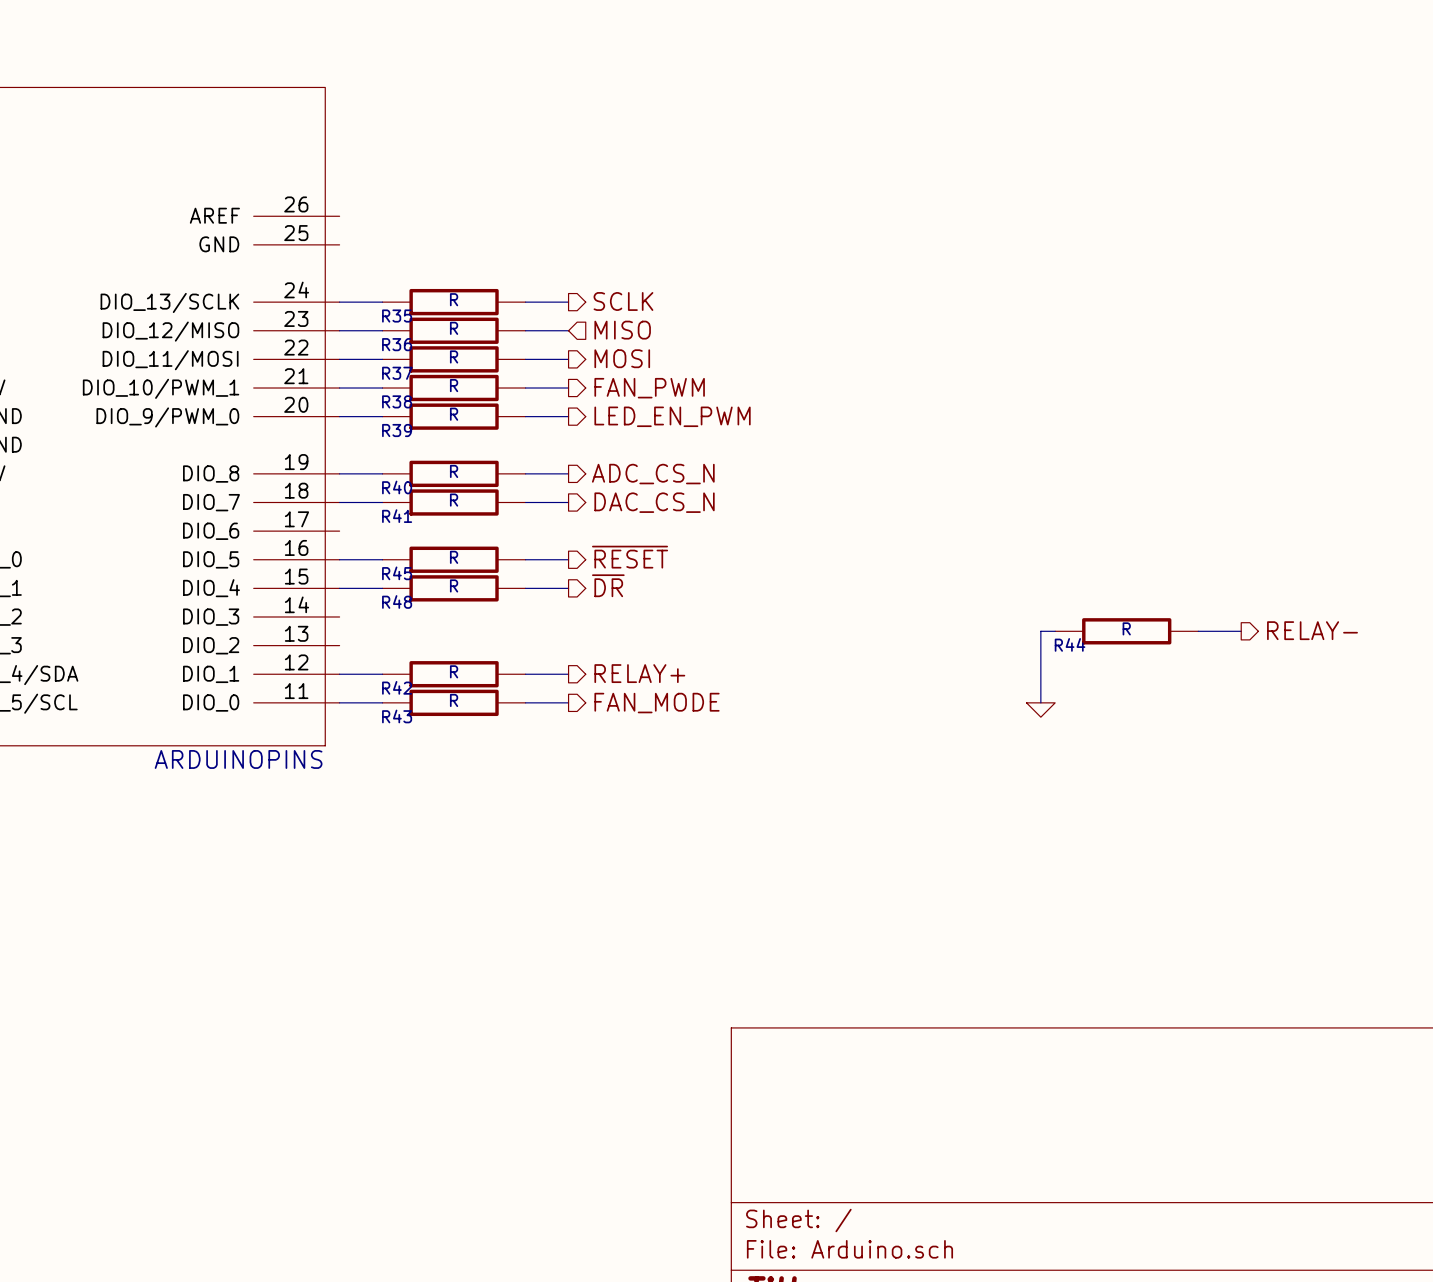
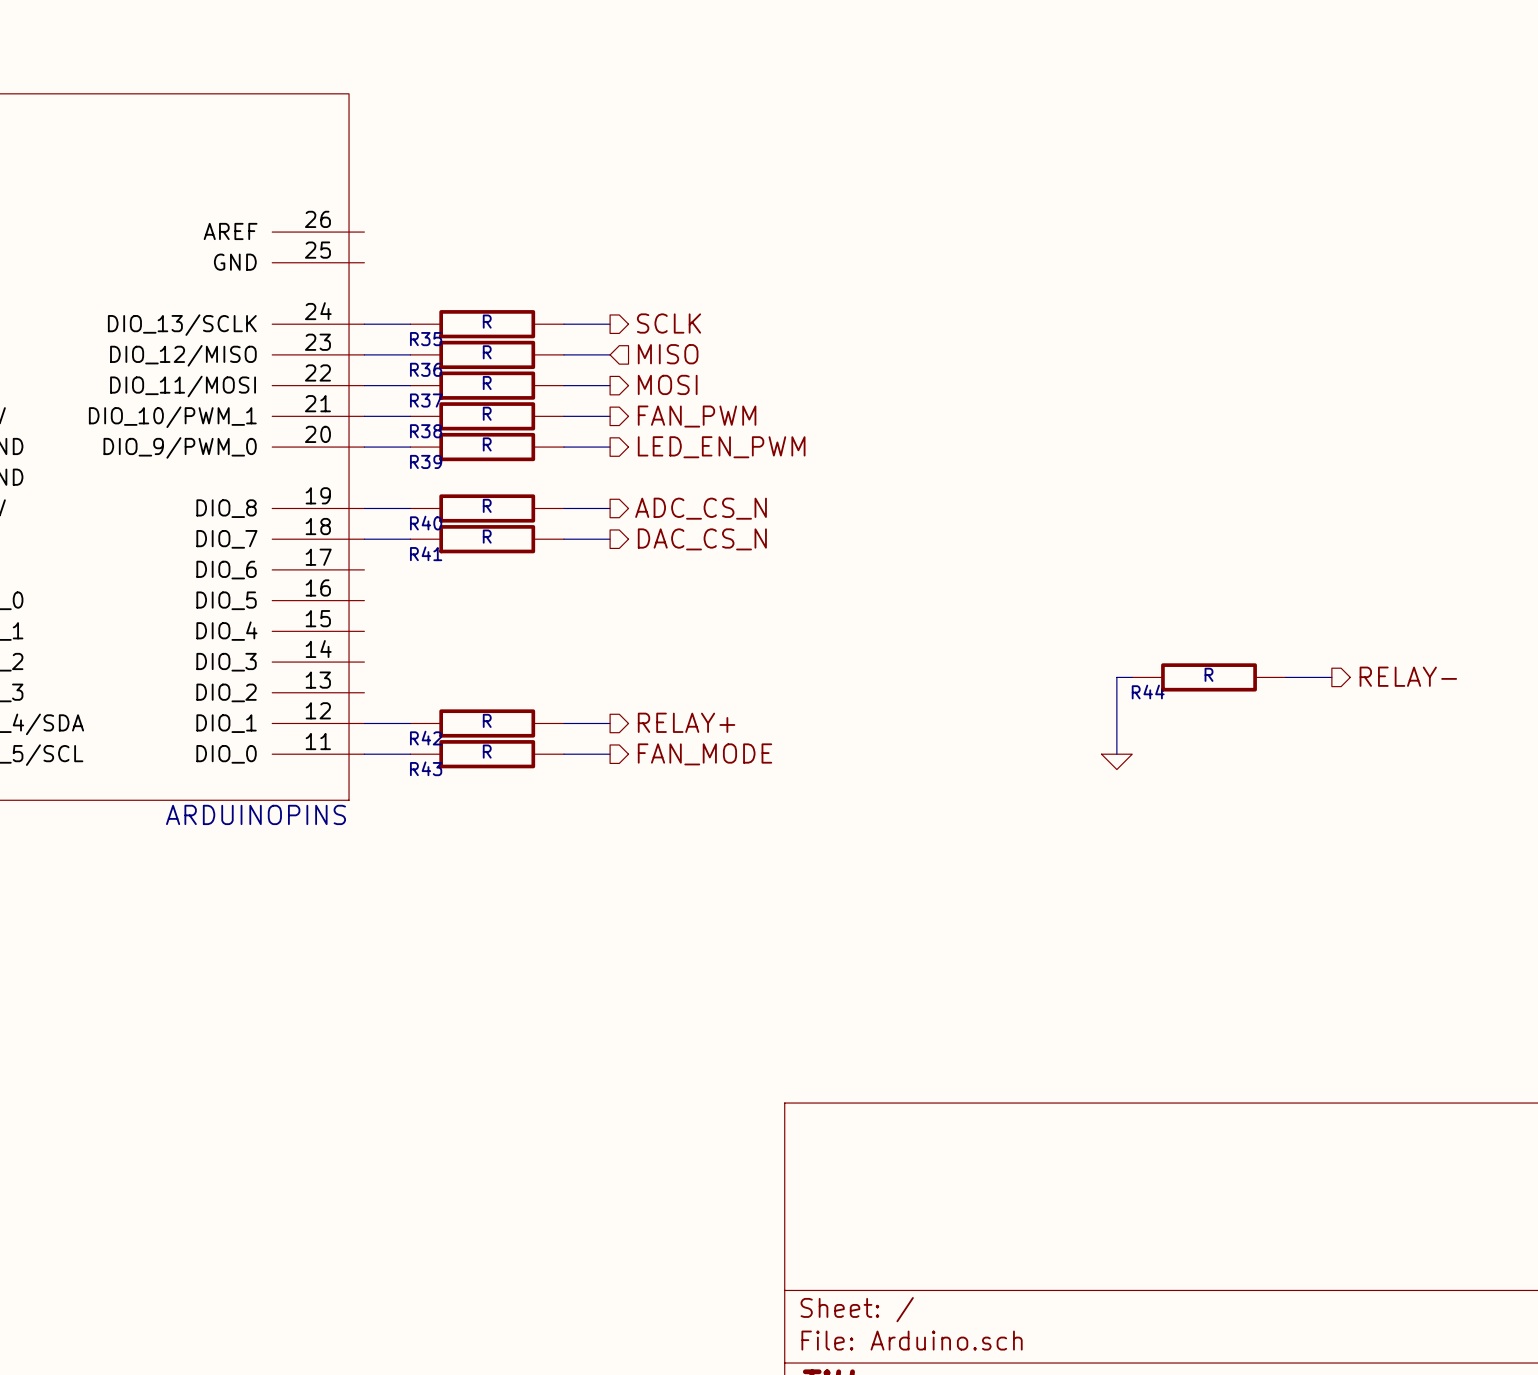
hierarchical label: ~{RESET} (630, 557) -> none
wire: (339, 559) (382, 559) -> none
R45: R (454, 559) -> none
wire: (525, 559) (568, 559) -> none
hierarchical label: ~{DR} (608, 585) -> none
wire: (339, 588) (382, 588) -> none
R48: R (454, 588) -> none
wire: (525, 588) (568, 588) -> none

